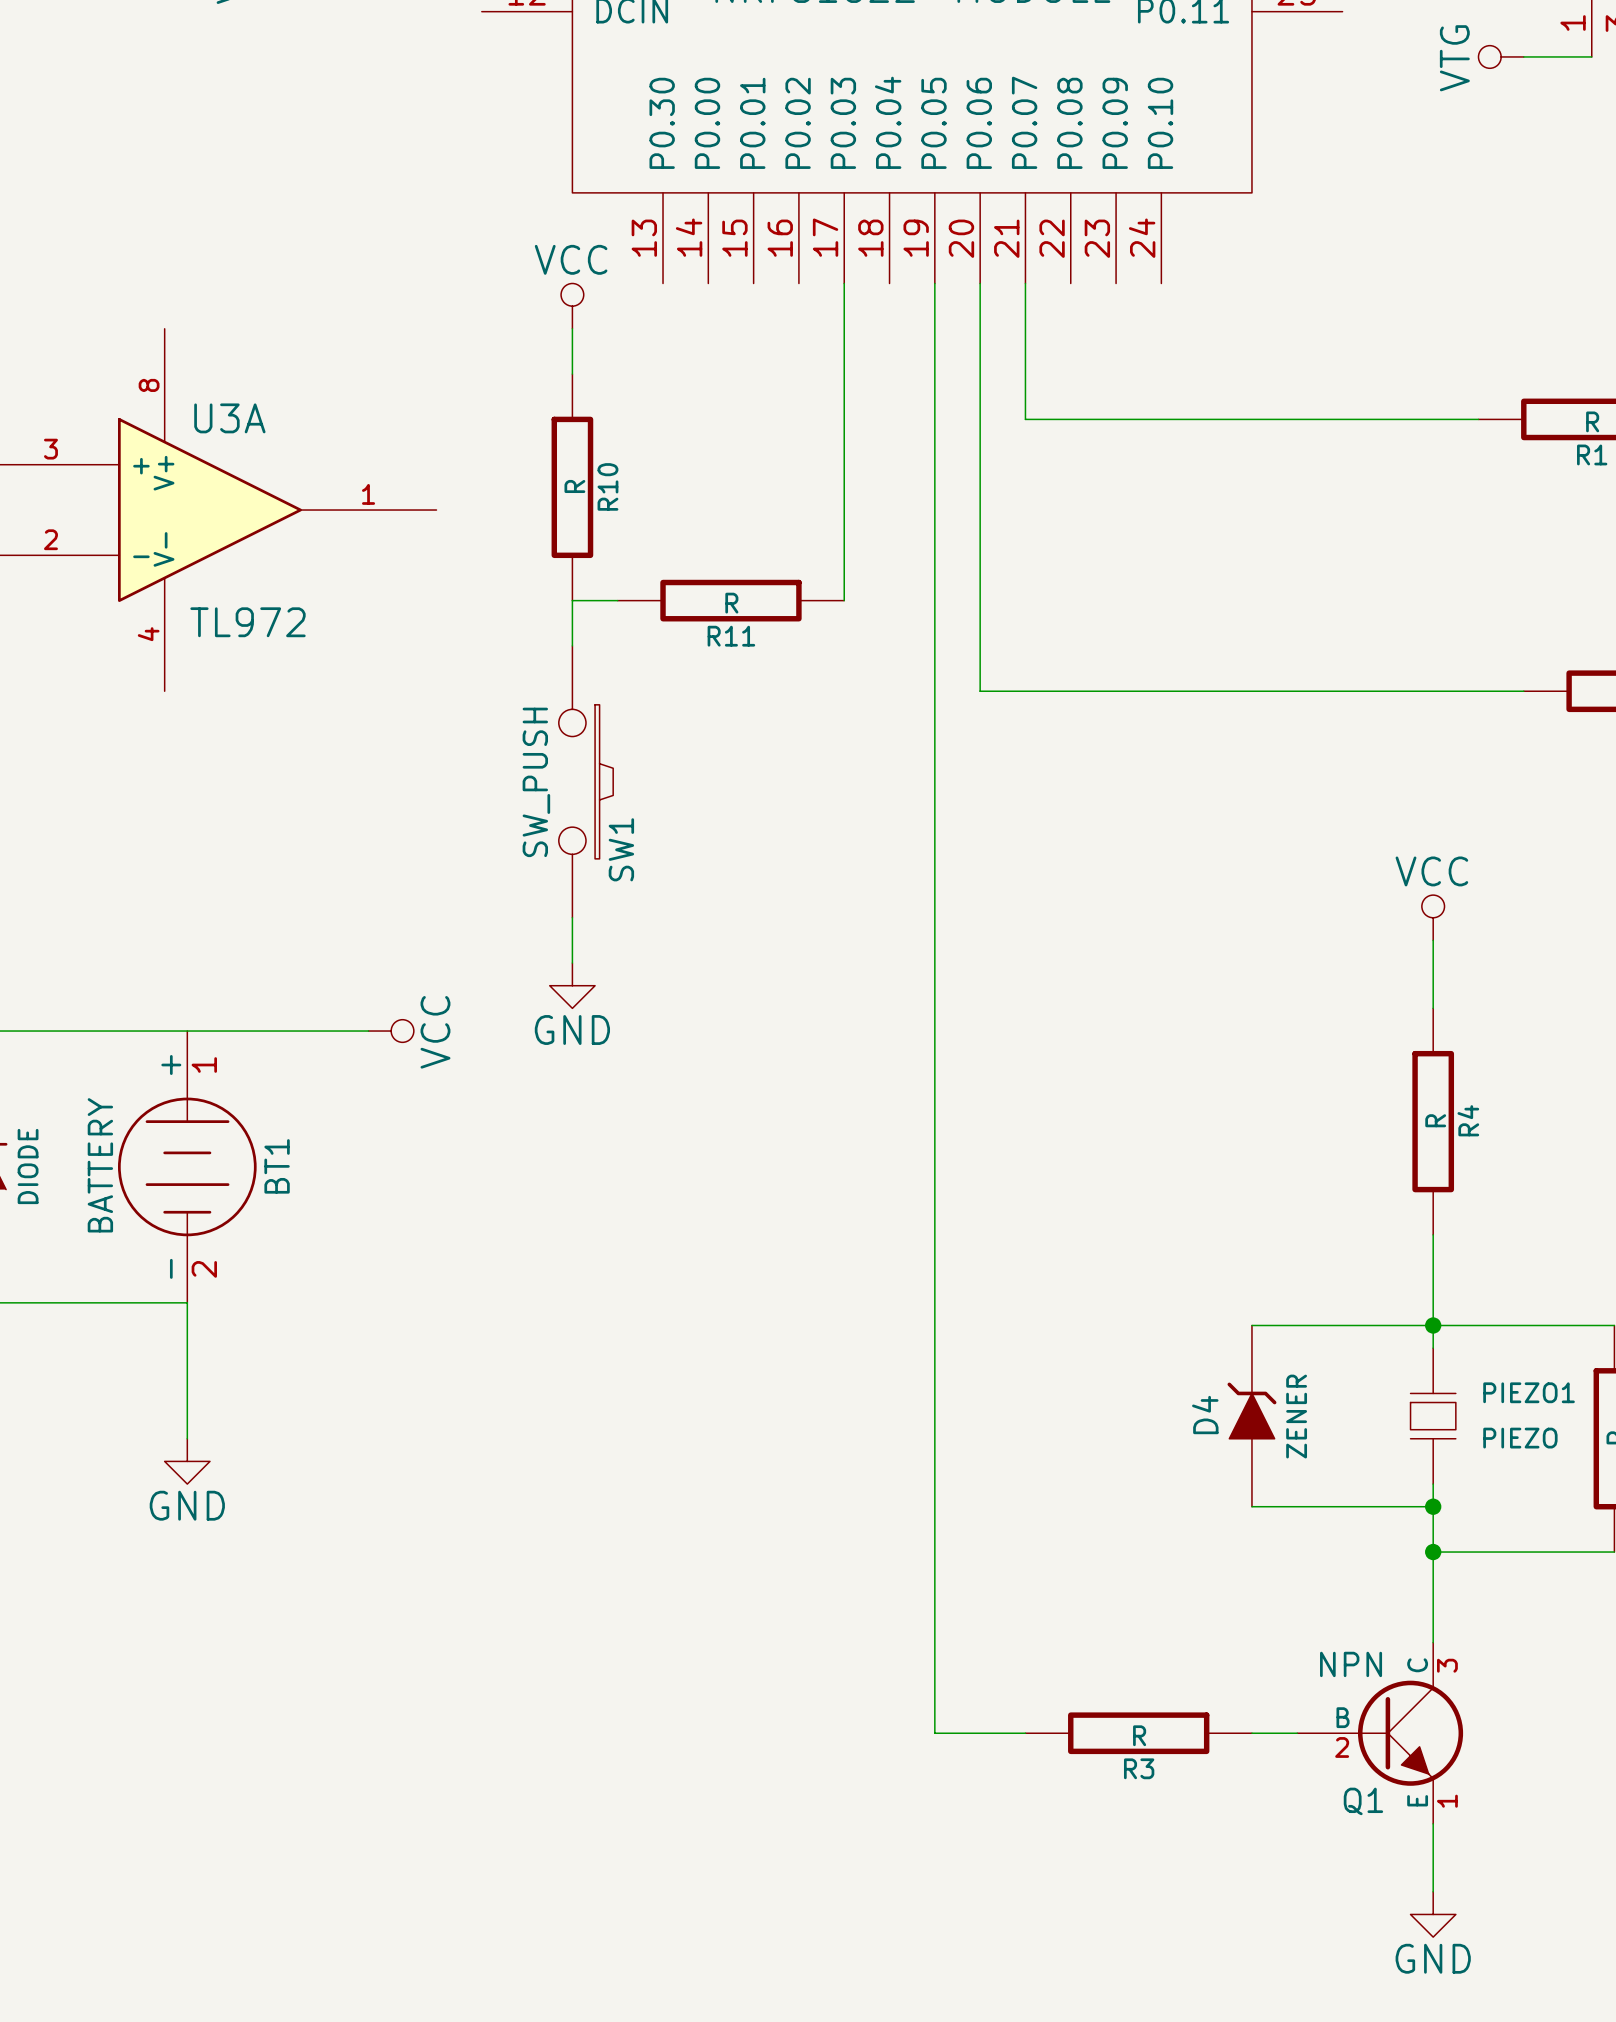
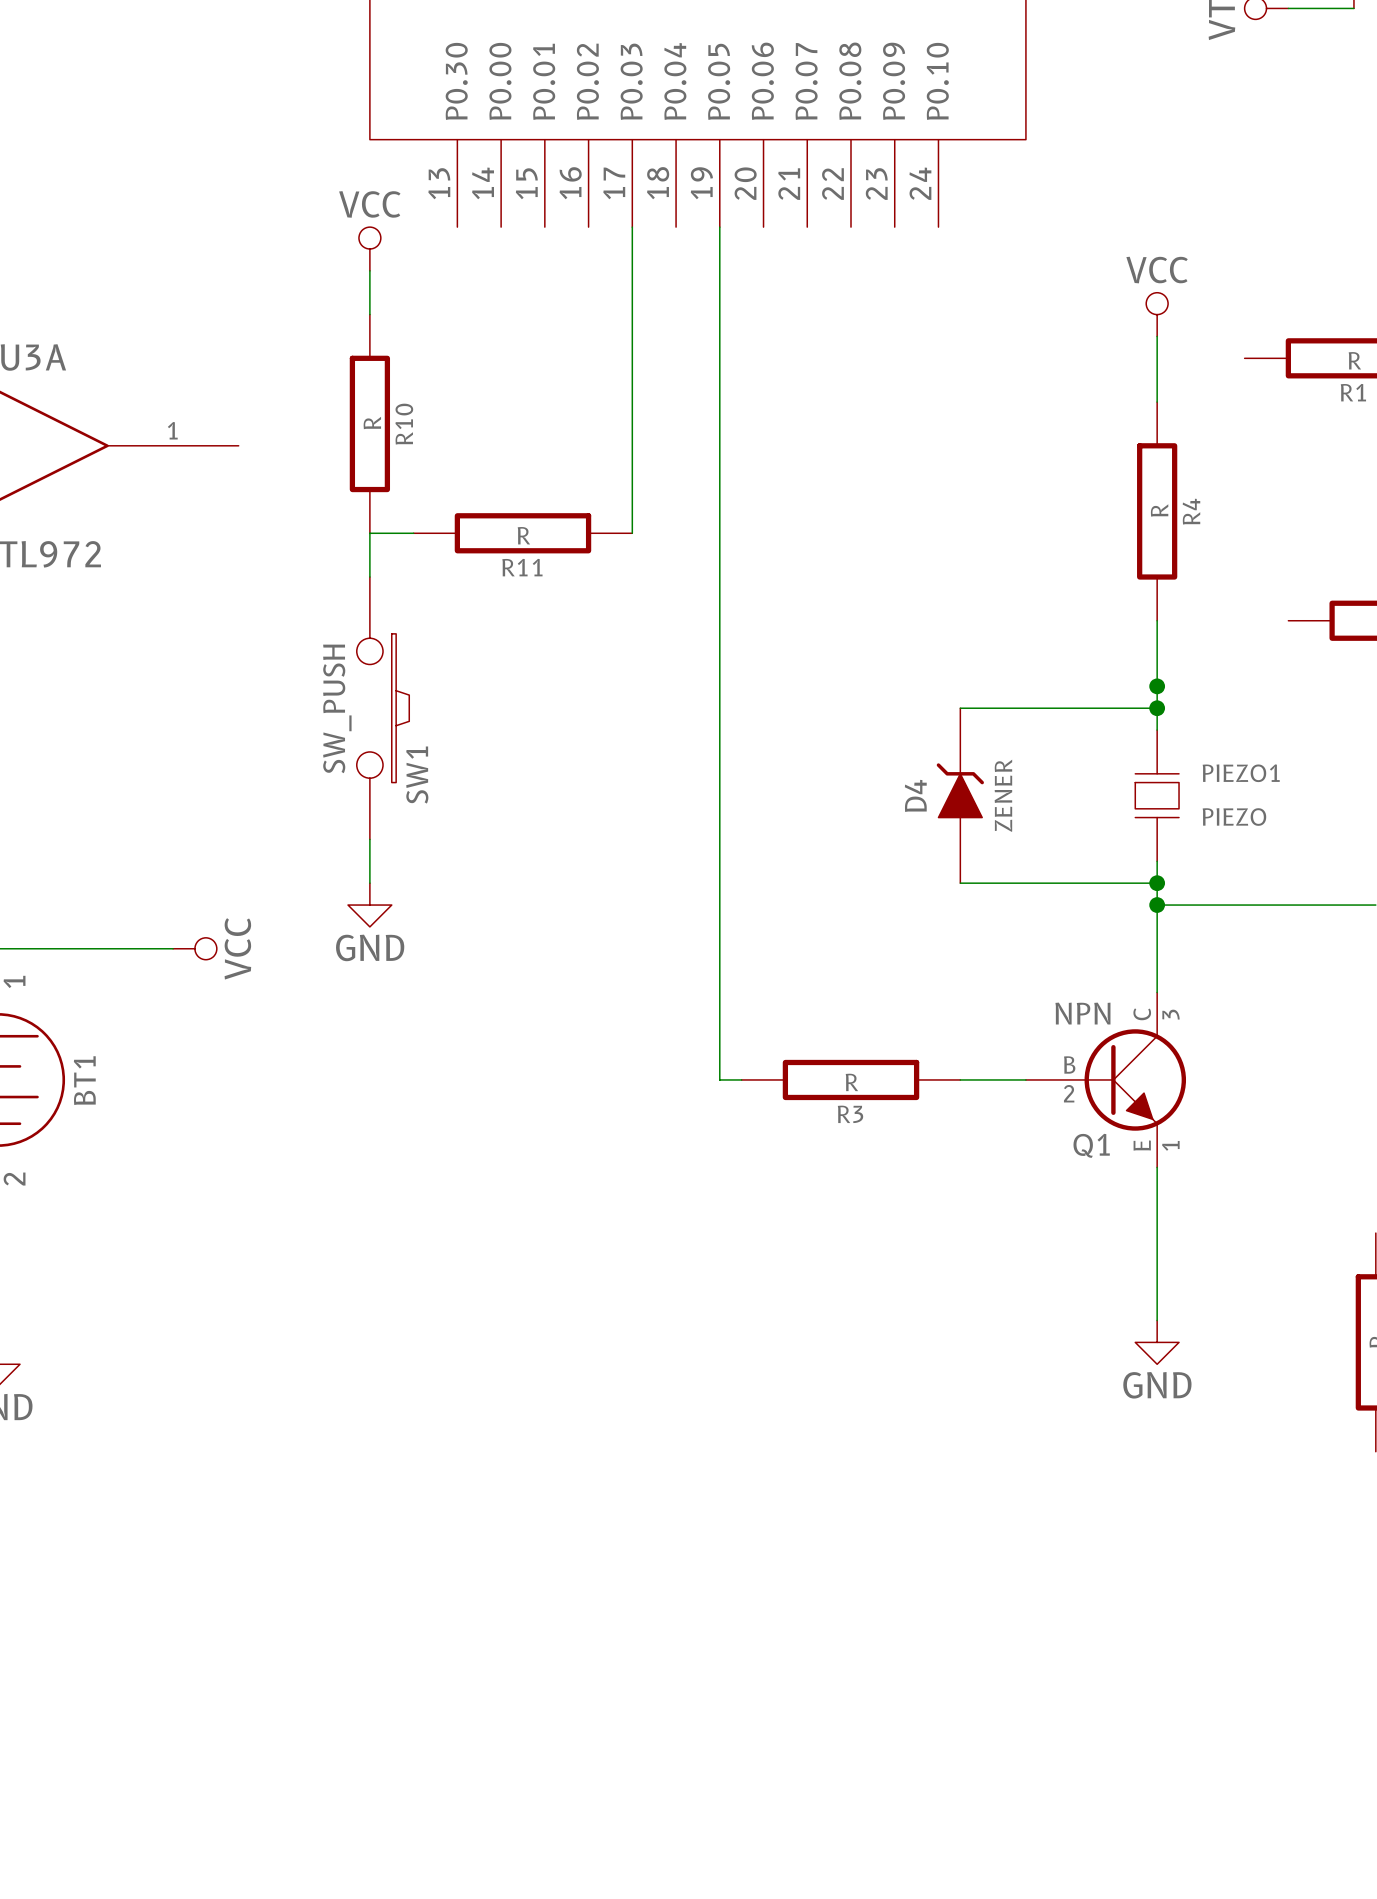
wire: (980, 283) (980, 691) (1523, 691) -> none
wire: (1025, 283) (1025, 419) (1478, 419) -> none
power symbol: none -> VCC (1157, 314)
wire: none -> (1157, 336) (1157, 402)
wire: none -> (1157, 620) (1157, 730)
junction: none -> (1157, 686)
wire: none -> (960, 708) (1157, 708)
junction: none -> (1157, 708)
power symbol: VCC (1433, 917) -> none
wire: none -> (1157, 861) (1157, 992)
wire: (1433, 940) (1433, 1008) -> none
wire: none -> (960, 883) (1157, 883)
junction: none -> (1157, 883)
wire: none -> (1157, 905) (1375, 905)
junction: none -> (1157, 905)
R4 position: (1433, 1121) -> (1157, 511)
wire: (934, 1166) (934, 1733) (1025, 1733) -> (719, 1079) (741, 1079)
wire: none -> (960, 1079) (1025, 1079)
wire: (1433, 1234) (1433, 1348) -> none
wire: (1251, 1325) (1614, 1325) -> none
junction: (1433, 1325) -> none
D4 position: (1251, 1416) -> (960, 795)
PIEZO1 position: (1433, 1416) -> (1157, 795)
power symbol: none -> GND (1157, 1342)
wire: (1433, 1484) (1433, 1642) -> (1157, 1167) (1157, 1320)
wire: (1251, 1506) (1433, 1506) -> none
junction: (1433, 1506) -> none
wire: (1433, 1552) (1614, 1552) -> none
junction: (1433, 1552) -> none
R3 position: (1138, 1733) -> (850, 1079)
wire: (1251, 1733) (1297, 1733) -> none
Q1 position: (1380, 1733) -> (1105, 1079)
wire: (1433, 1823) (1433, 1891) -> none
power symbol: GND (1433, 1914) -> none

